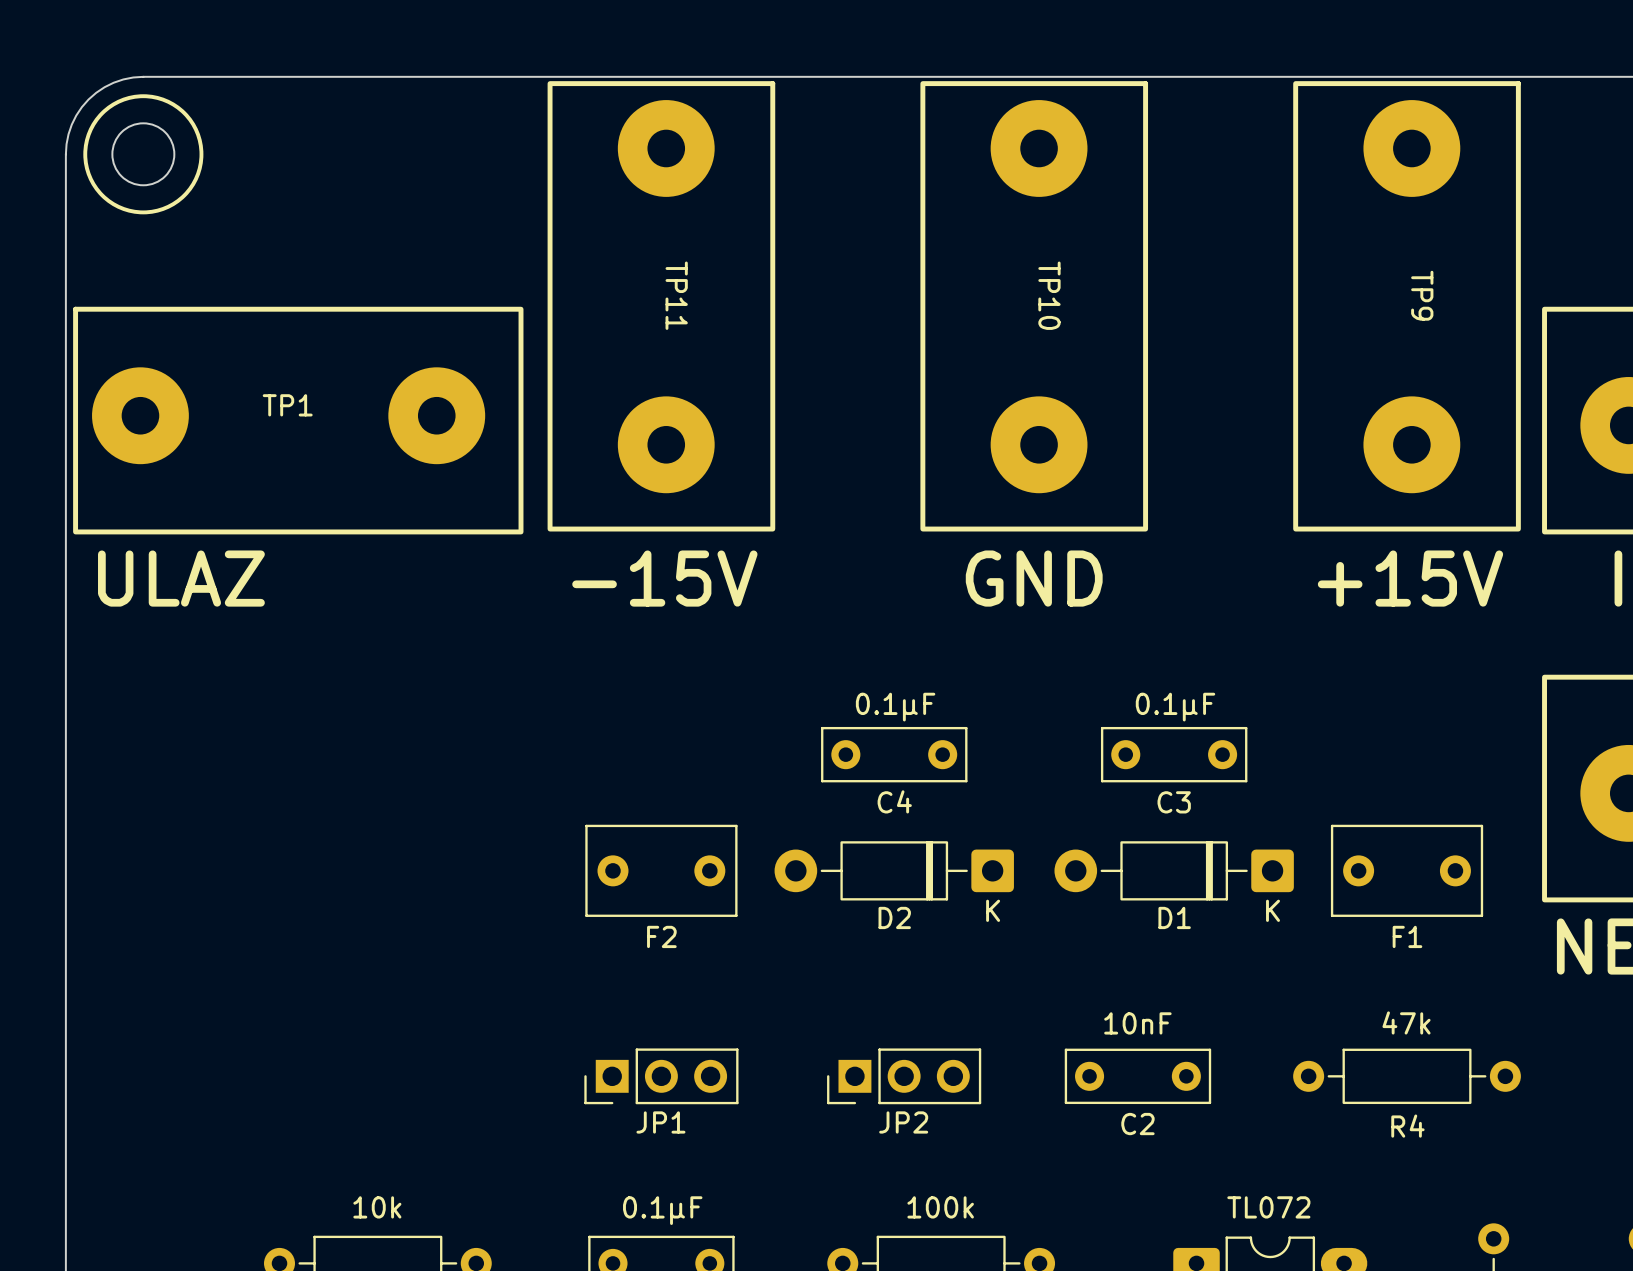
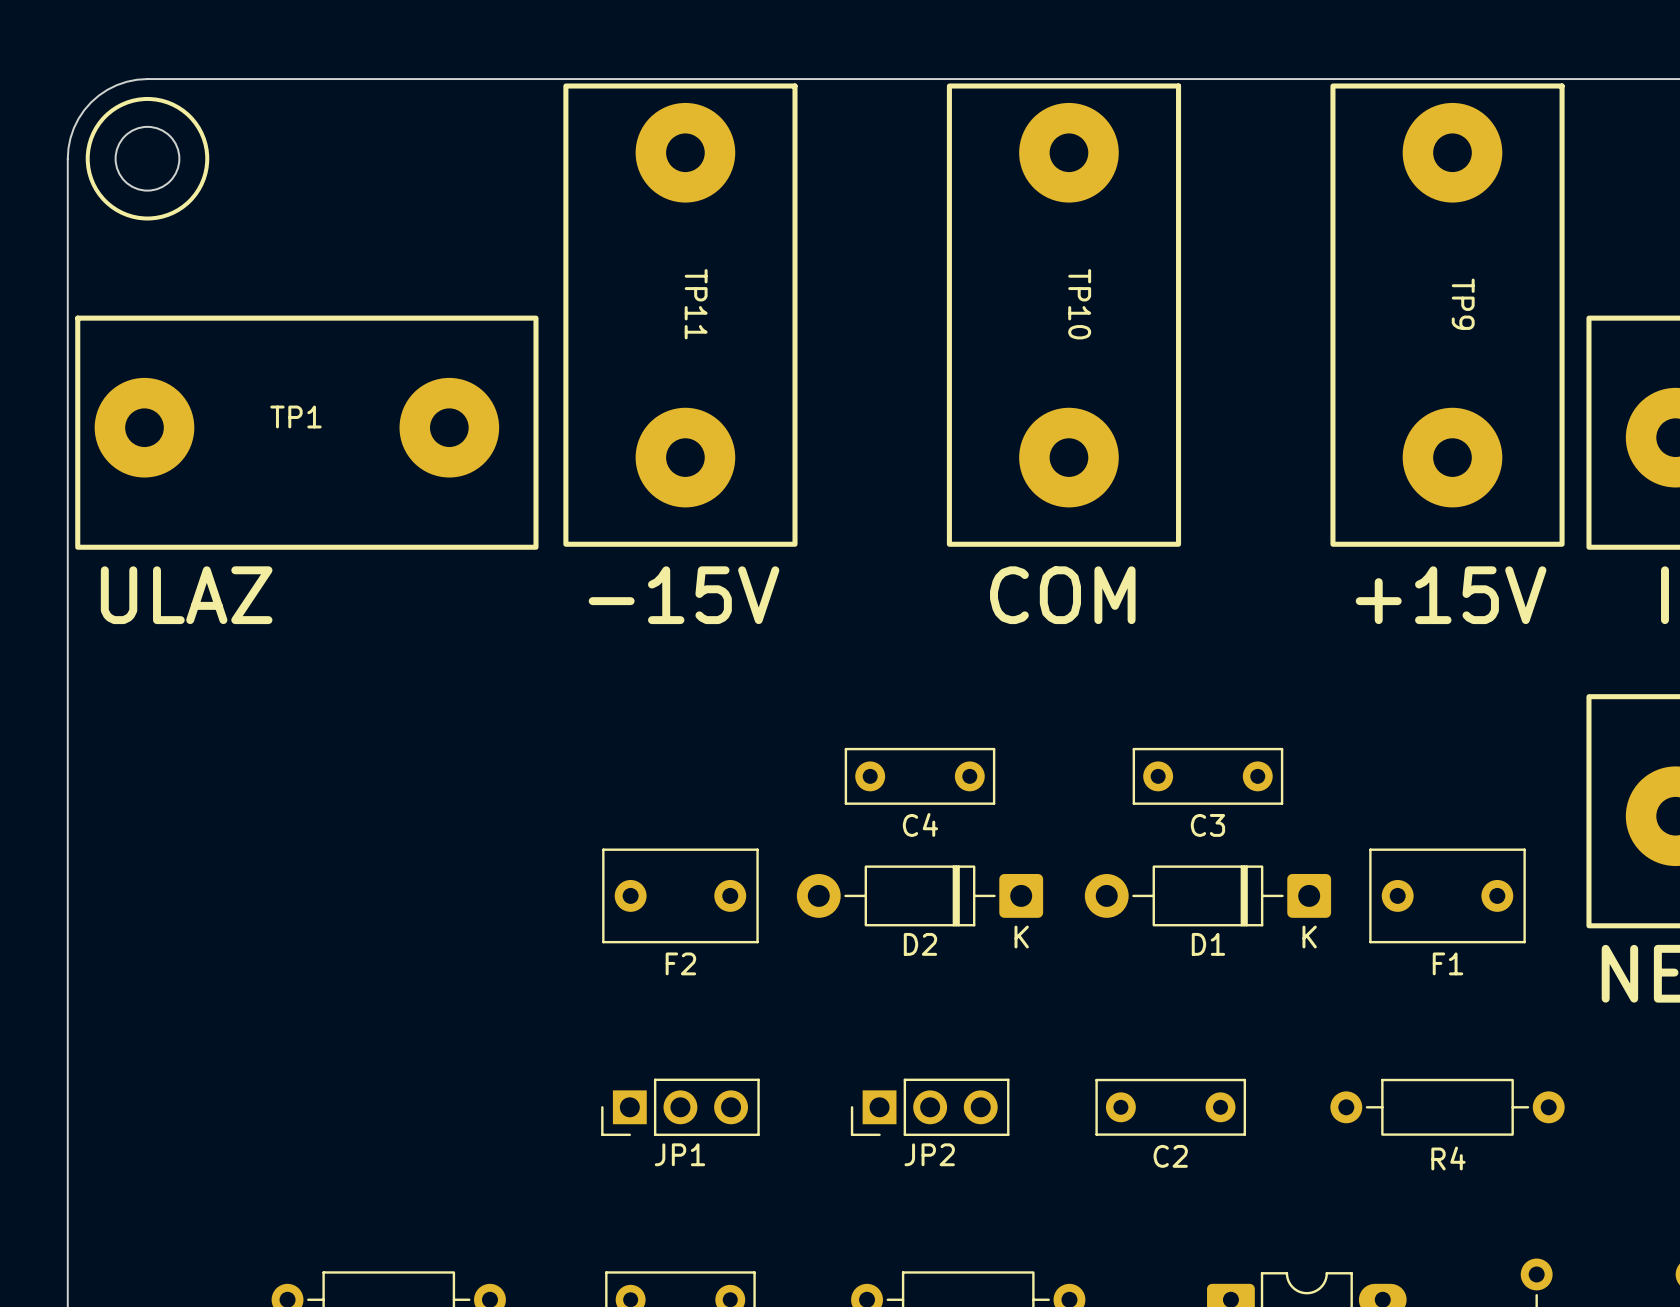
text: GND (1034, 578) -> COM (1062, 595)
text: 0.1µF (895, 707) -> none
text: 0.1µF (1175, 707) -> none
text: 47k (1406, 1022) -> none
text: 10nF (1137, 1023) -> none
text: 10k (377, 1207) -> none
text: 100k (940, 1207) -> none
text: TL072 (1268, 1207) -> none
text: 0.1µF (662, 1210) -> none

